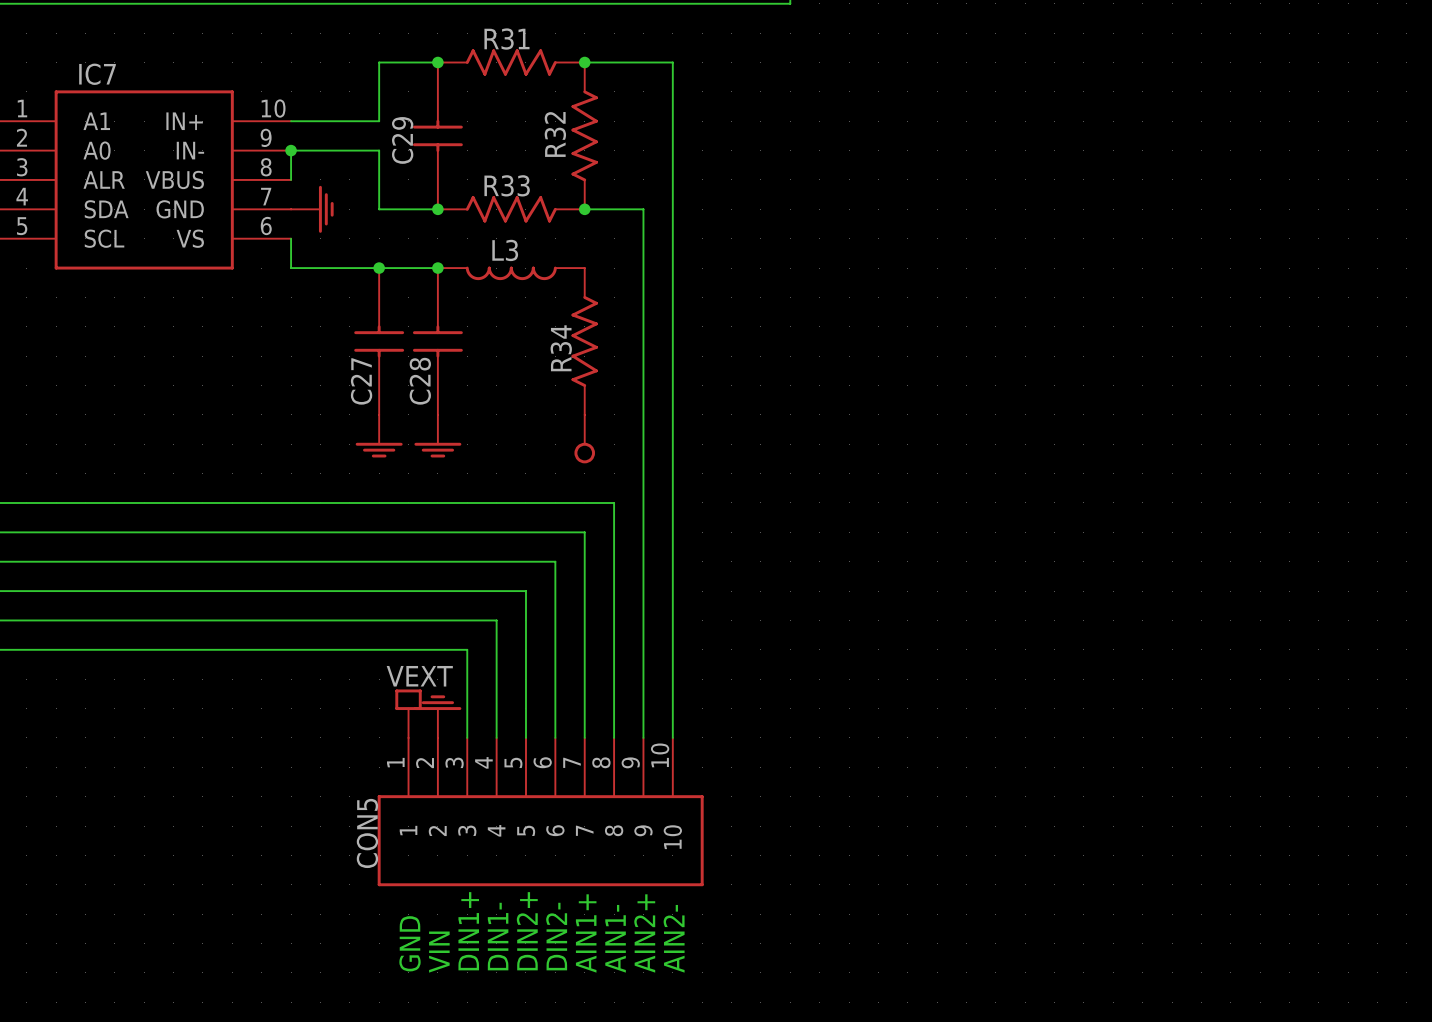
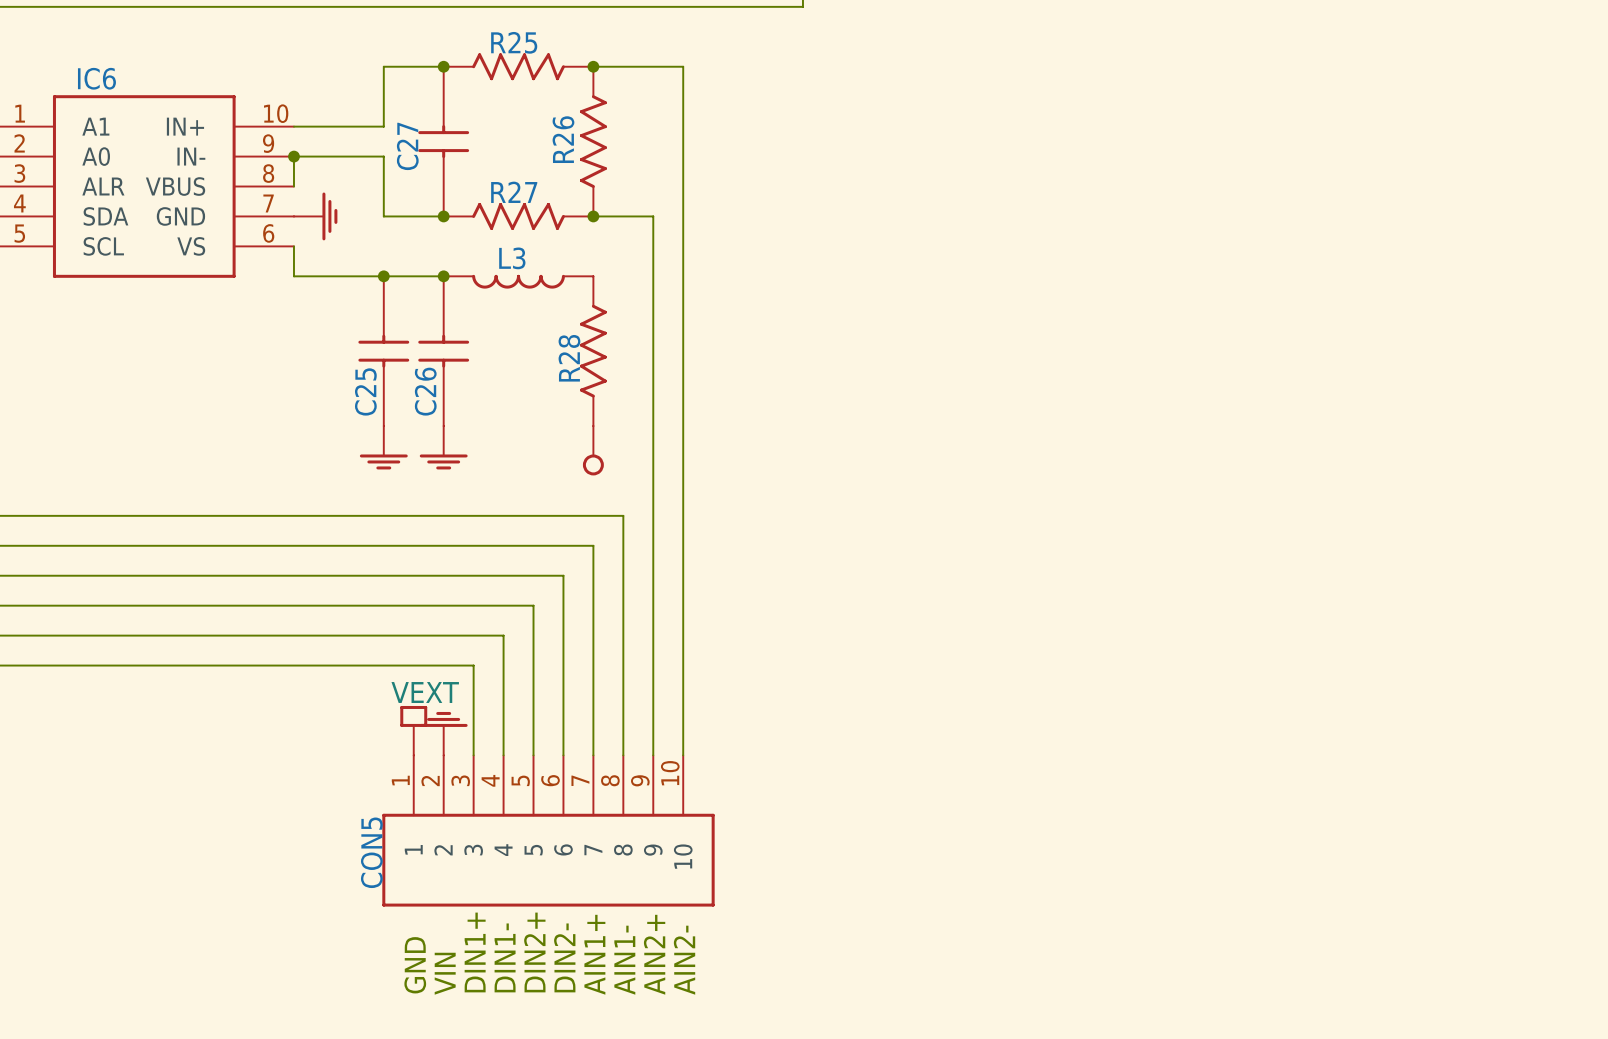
R31 name: R31 (506, 39) -> R25 (514, 42)
IC7 name: IC7 (97, 74) -> IC6 (96, 78)
R32 name: R32 (555, 134) -> R26 (563, 139)
C29 name: C29 (402, 140) -> C27 (407, 146)
R33 name: R33 (507, 185) -> R27 (514, 192)
R34 name: R34 (561, 348) -> R28 (569, 358)
C27 name: C27 (361, 381) -> C25 (365, 391)
C28 name: C28 (420, 381) -> C26 (425, 391)

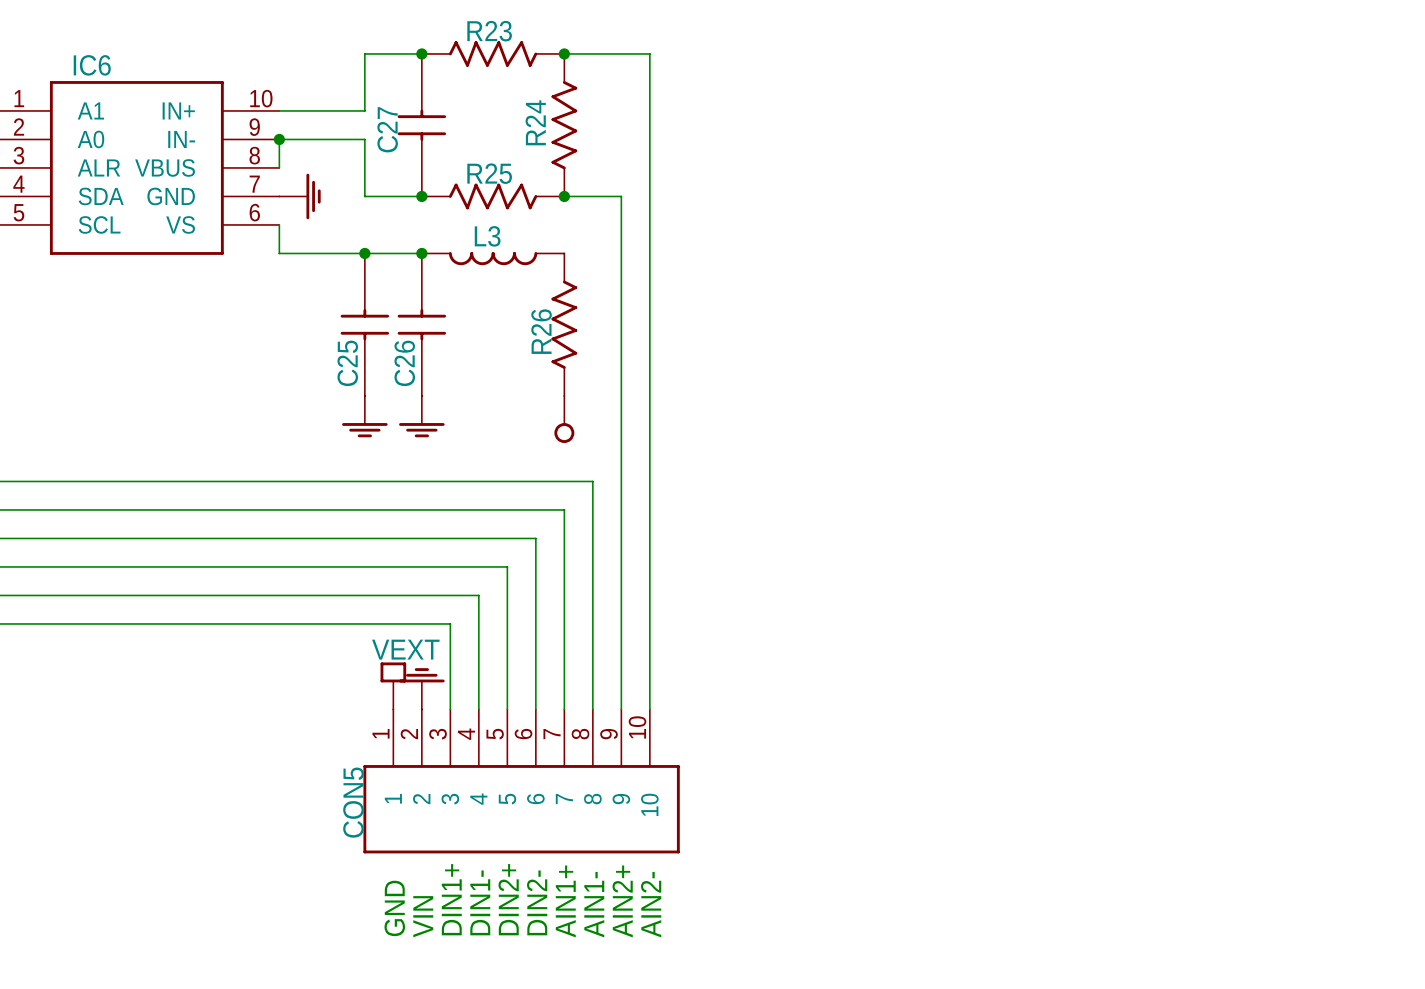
R25 name: R25 (514, 42) -> R23 (489, 31)
R26 name: R26 (563, 139) -> R24 (535, 122)
R27 name: R27 (514, 192) -> R25 (489, 173)
R28 name: R28 (569, 358) -> R26 (541, 331)

